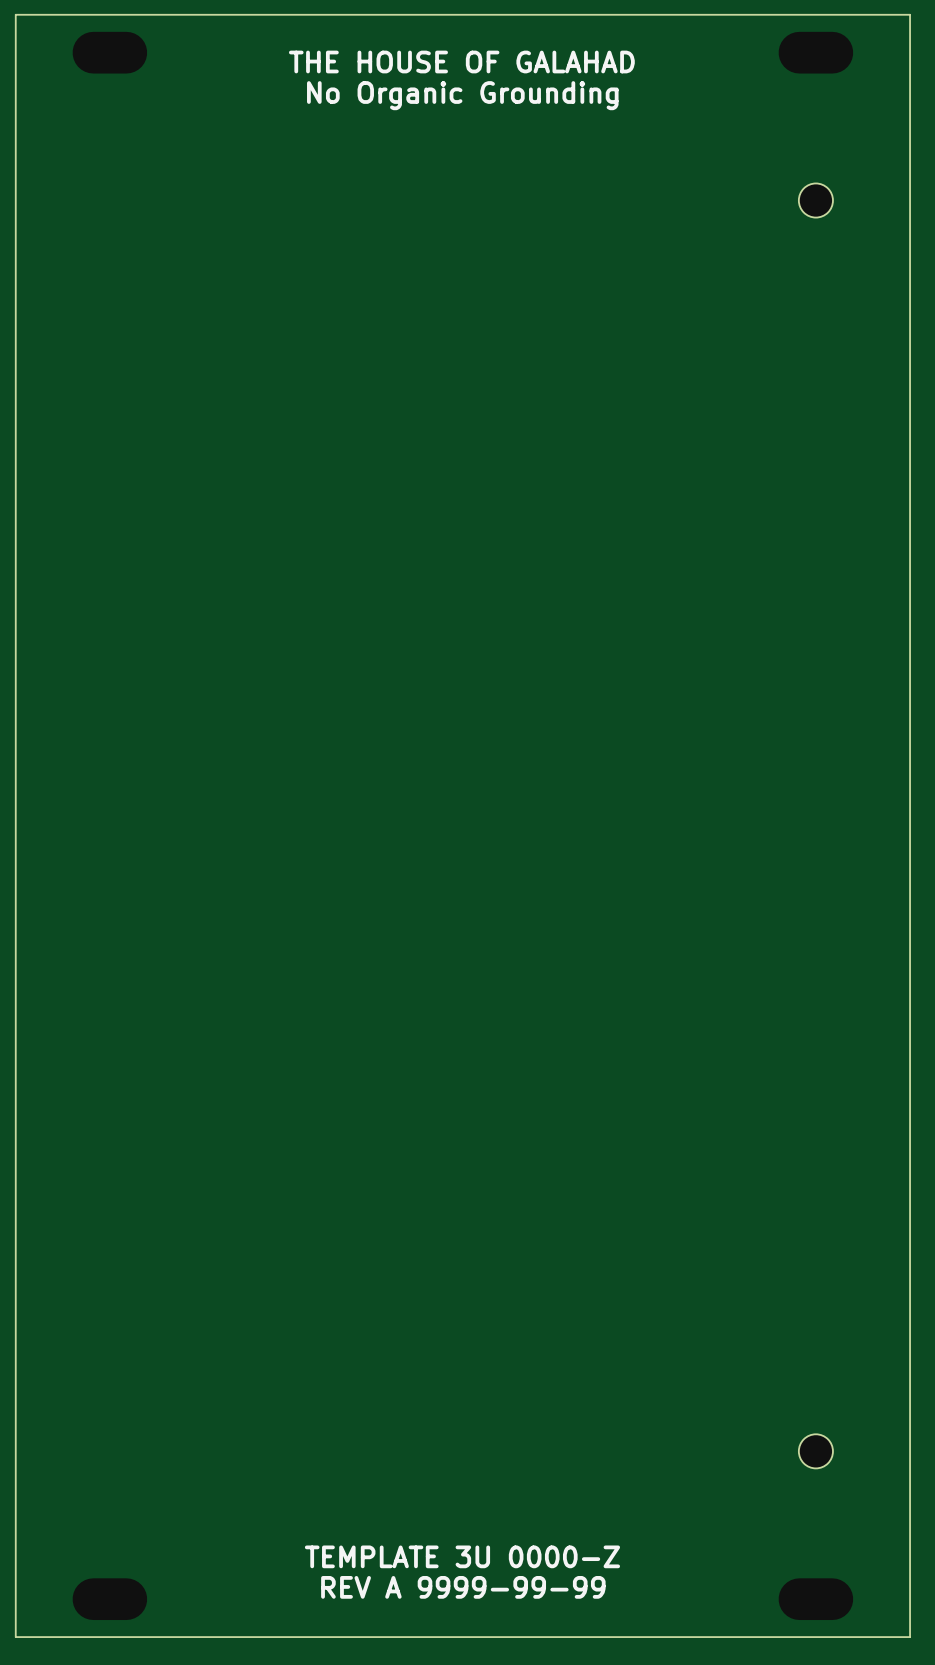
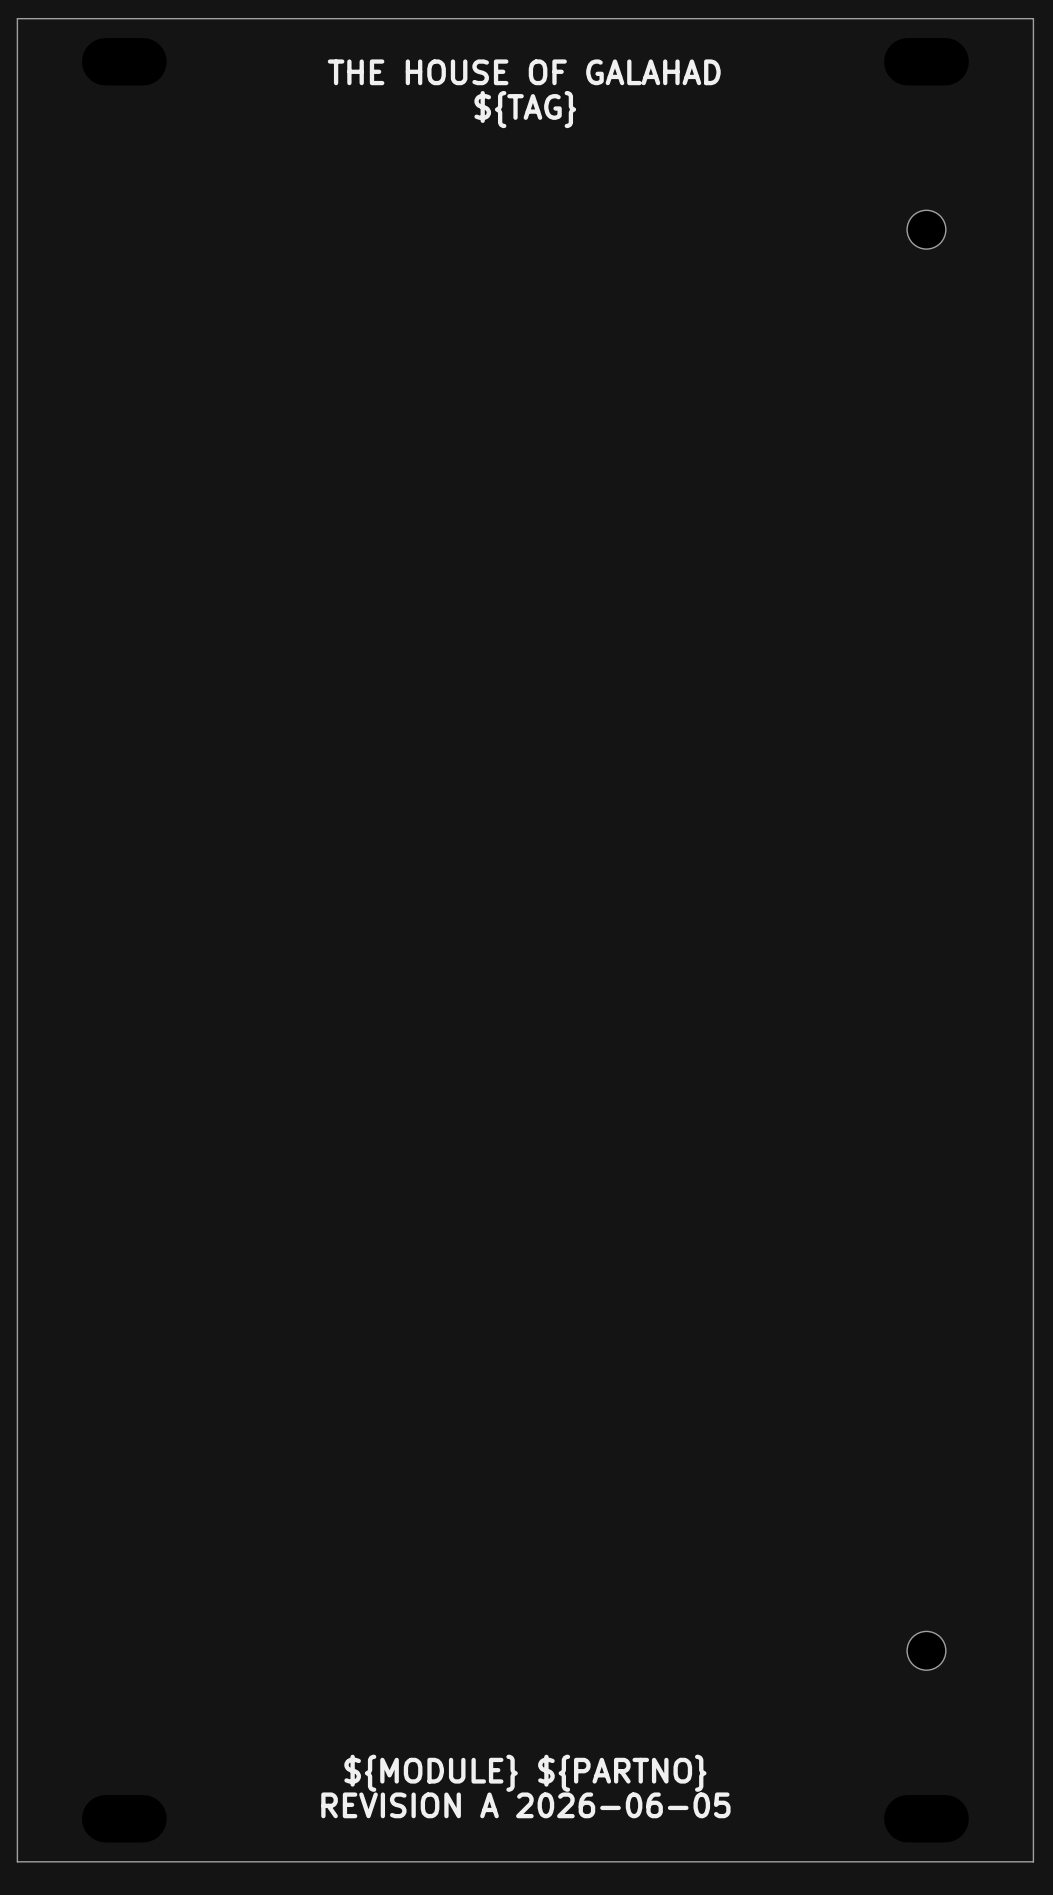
text: No Organic Grounding (462, 95) -> ${TAG} (525, 109)
text: TEMPLATE 3U 0000-Z (462, 1556) -> ${MODULE} ${PARTNO} (525, 1773)
text: REV A 9999-99-99 (463, 1587) -> REVISION A 2026-06-05 (525, 1805)

